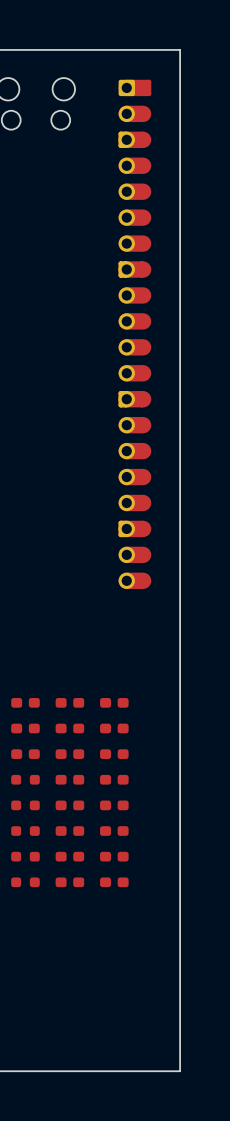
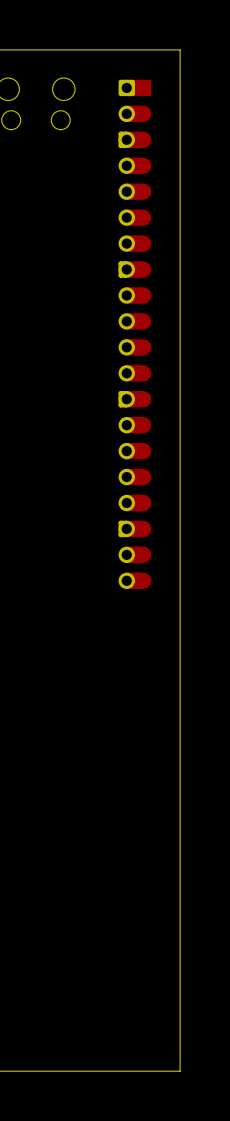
part: (25, 702) -> none
part: (69, 702) -> none
part: (114, 702) -> none
part: (25, 728) -> none
part: (69, 728) -> none
part: (114, 728) -> none
part: (25, 754) -> none
part: (69, 754) -> none
part: (114, 754) -> none
part: (25, 779) -> none
part: (69, 779) -> none
part: (114, 779) -> none
part: (25, 805) -> none
part: (69, 805) -> none
part: (114, 805) -> none
part: (25, 831) -> none
part: (69, 831) -> none
part: (114, 831) -> none
part: (25, 856) -> none
part: (69, 856) -> none
part: (114, 856) -> none
part: (25, 882) -> none
part: (69, 882) -> none
part: (114, 882) -> none

